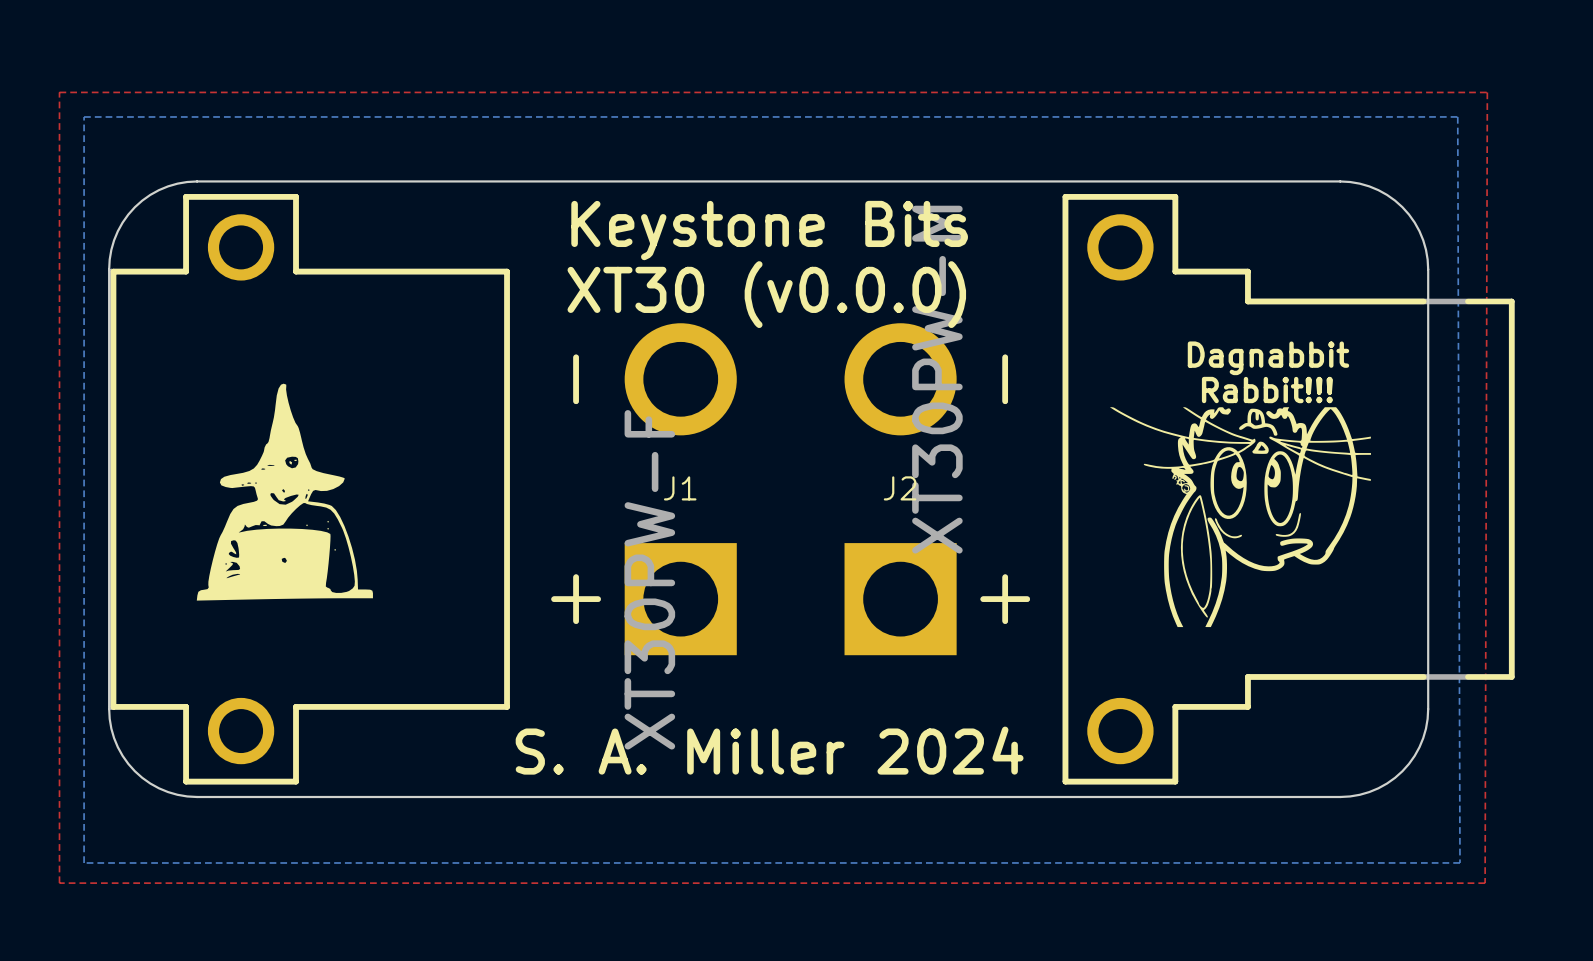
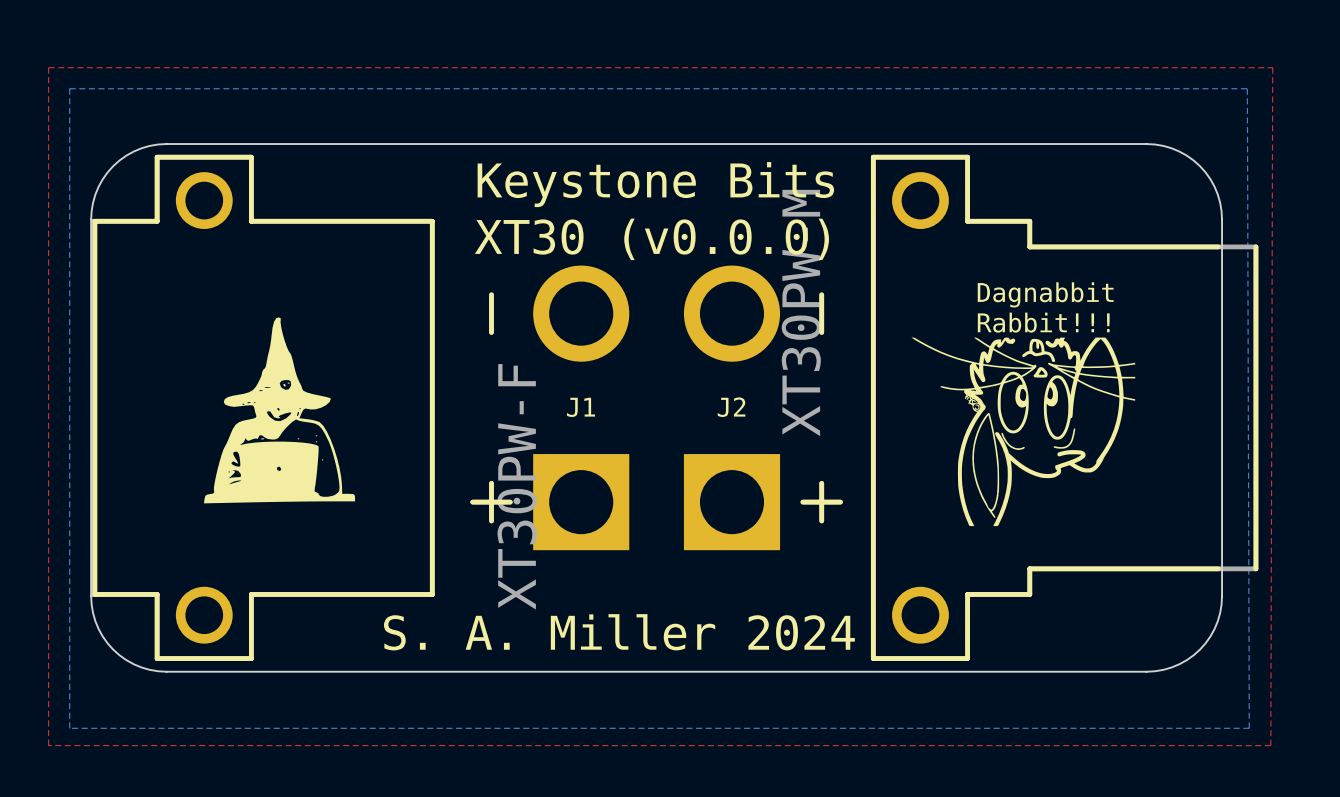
J2 footprint: [844, 194, 1515, 785] -> [683, 154, 1259, 661]
drawing position: (284, 492) -> (279, 410)
drawing position: (1240, 517) -> (1023, 431)
text position: S. A. Miller 2024 (769, 750) -> S. A. Miller 2024 (619, 632)

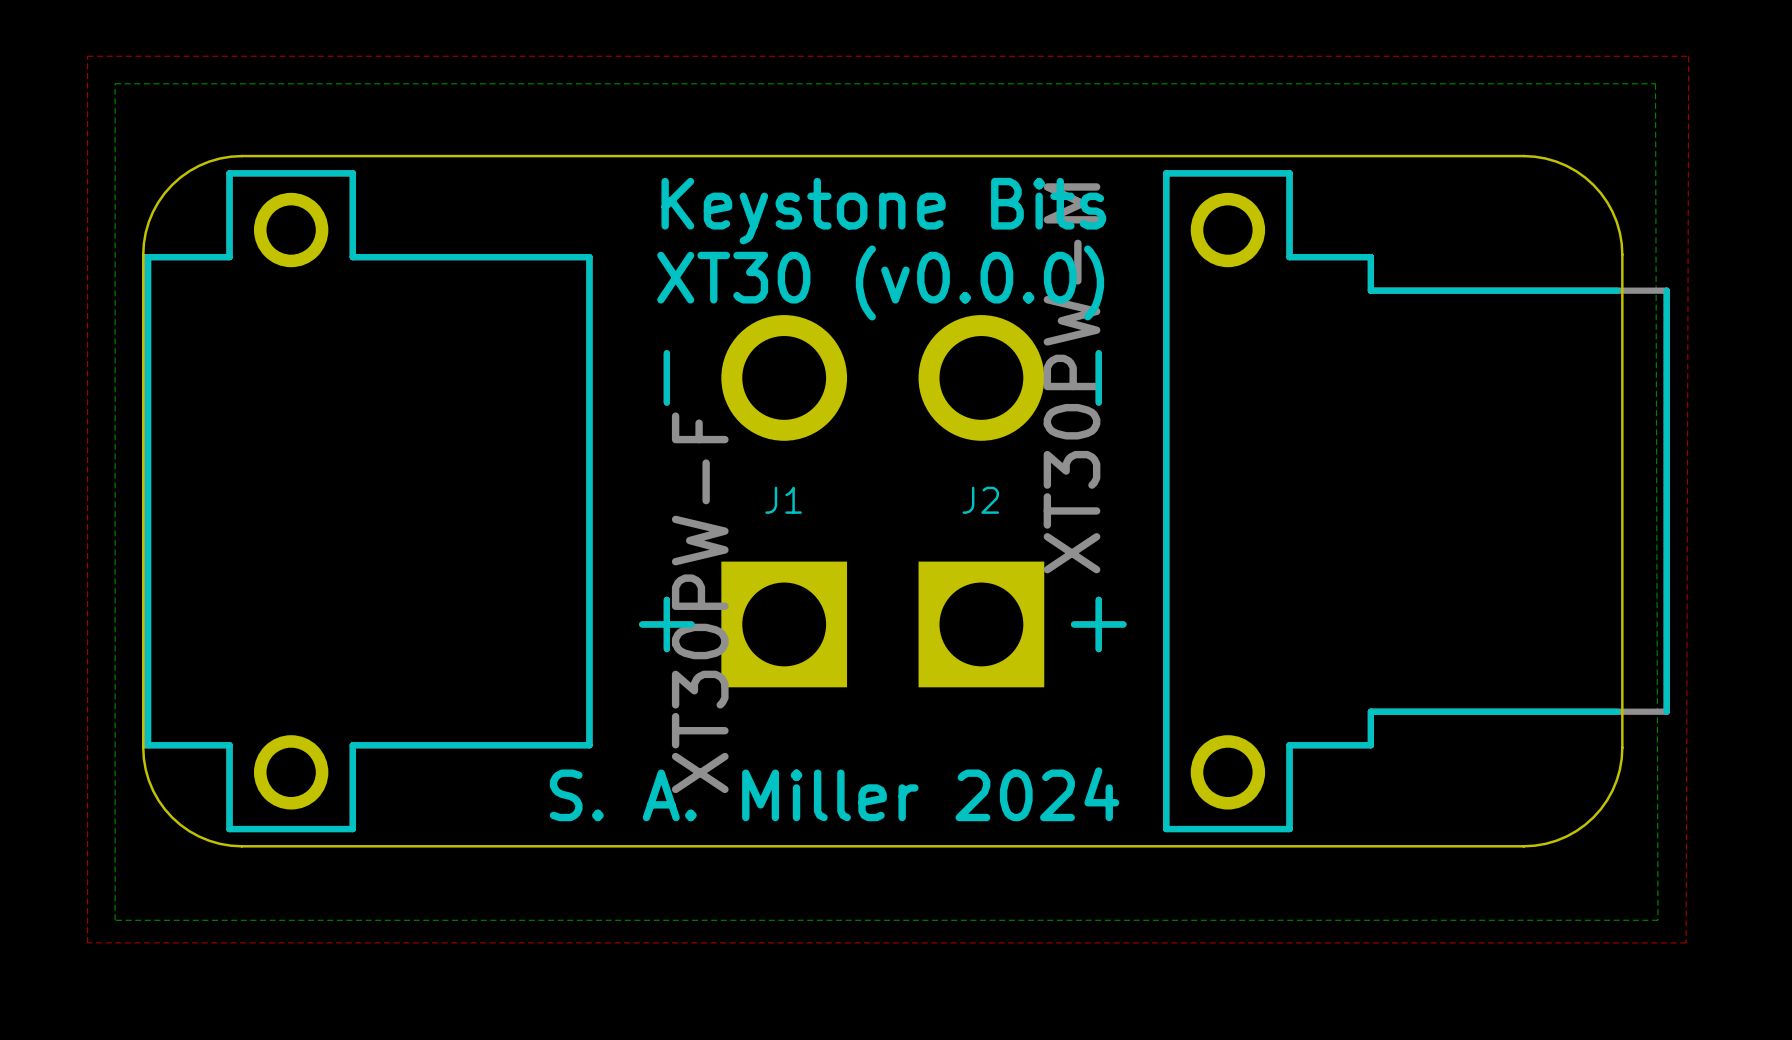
drawing: [204, 317, 356, 504] -> none
drawing: [911, 337, 1136, 527] -> none

